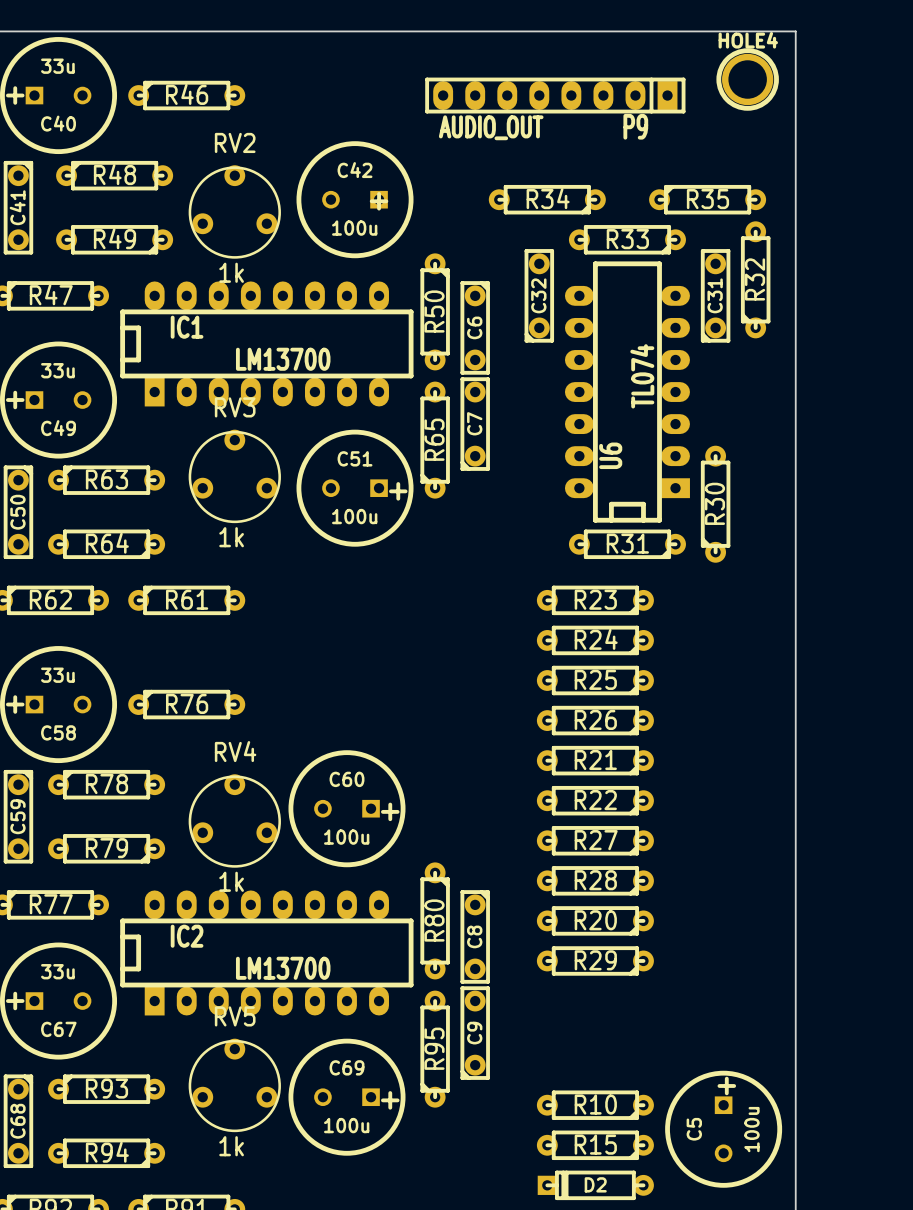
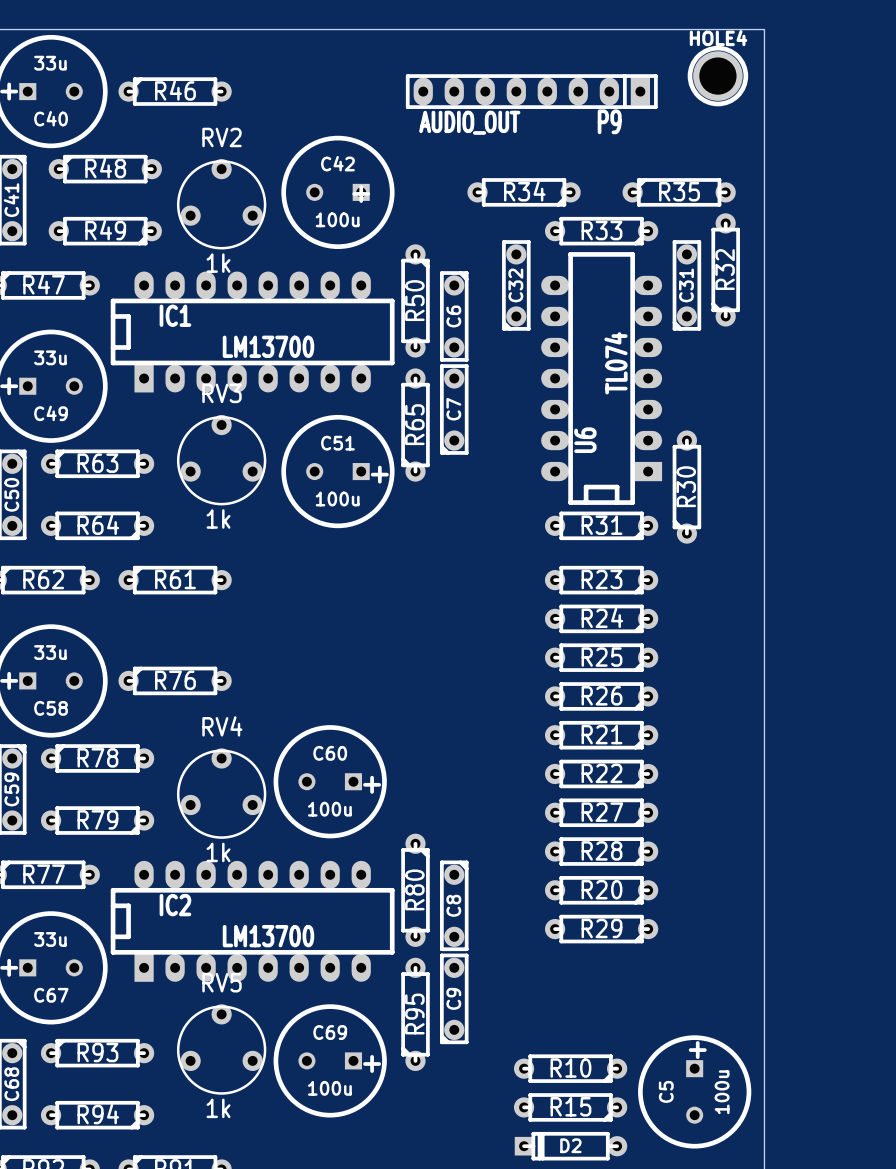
R23 position: (595, 600) -> (601, 580)
R24 position: (595, 640) -> (601, 618)
R25 position: (595, 680) -> (601, 657)
R26 position: (595, 720) -> (601, 696)
R21 position: (595, 760) -> (601, 735)
R22 position: (595, 800) -> (601, 773)
R27 position: (595, 840) -> (601, 812)
R28 position: (595, 880) -> (601, 851)
R20 position: (595, 920) -> (601, 890)
R29 position: (595, 960) -> (601, 929)

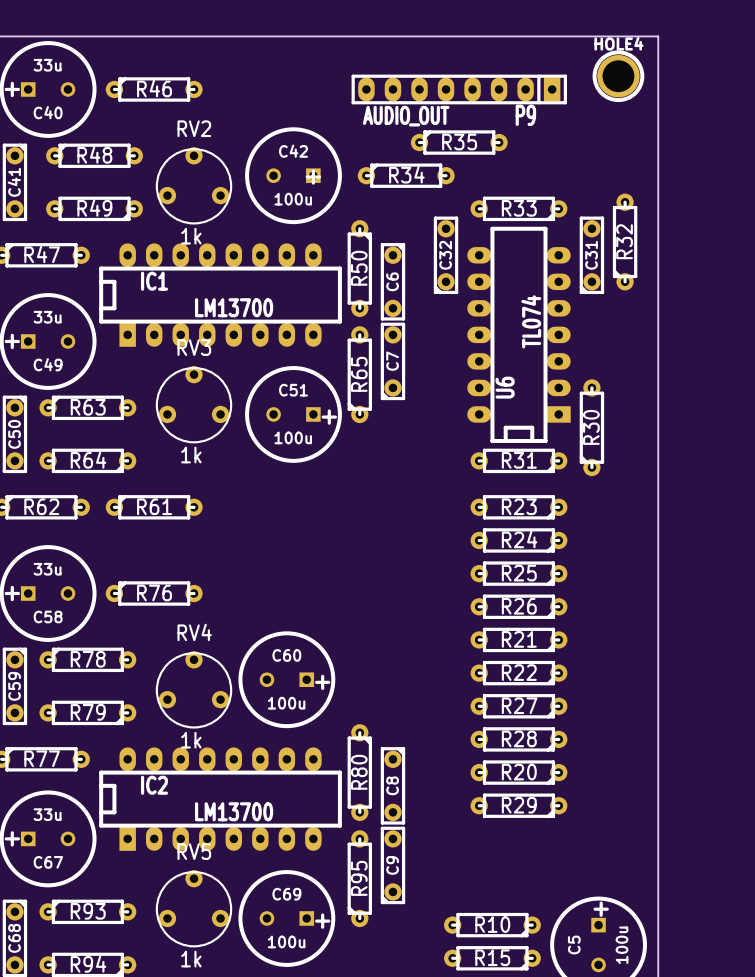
R34 rotation: 0° (524, 192) -> 180° (406, 175)
R35 position: (679, 192) -> (459, 142)

